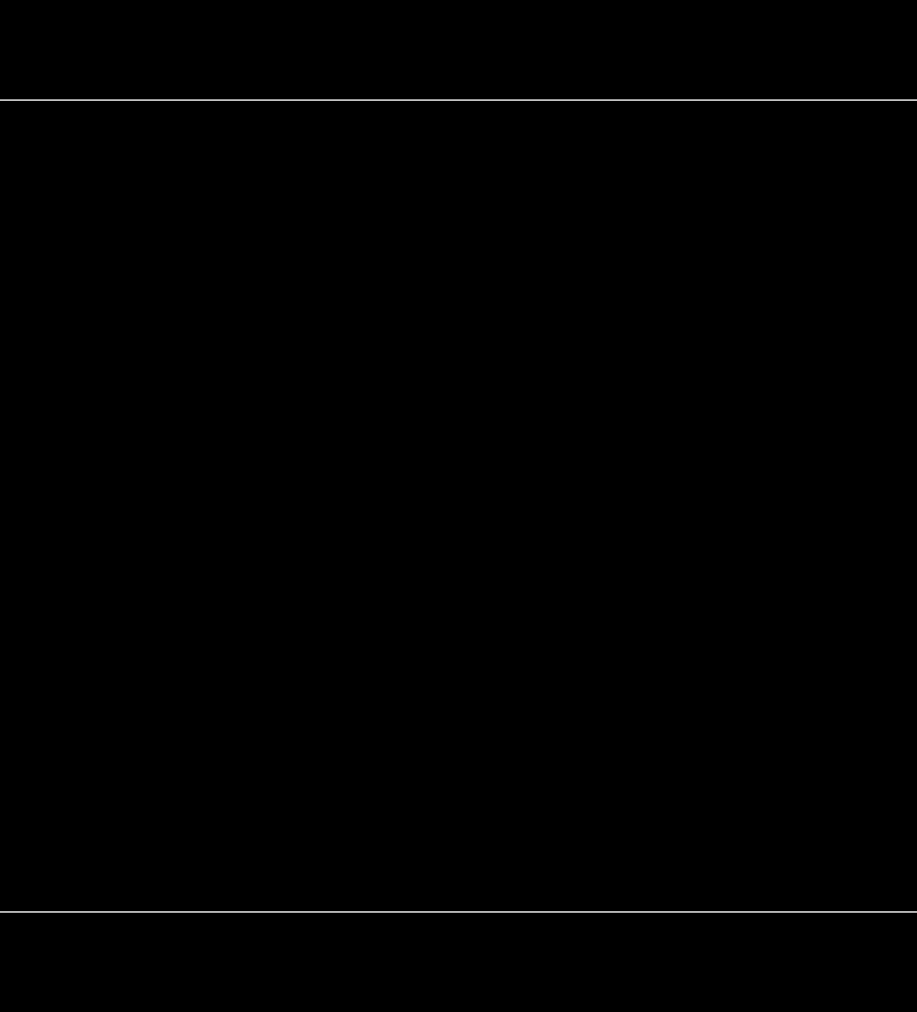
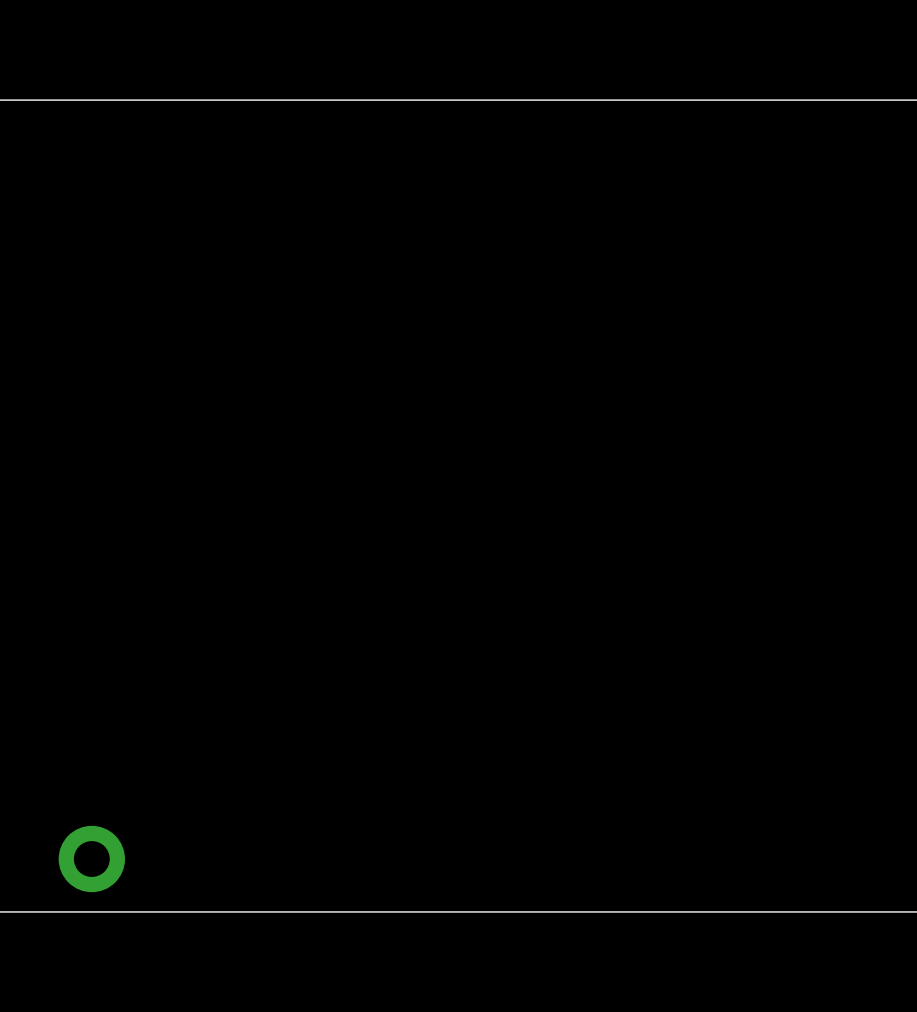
part: none -> (91, 859)

